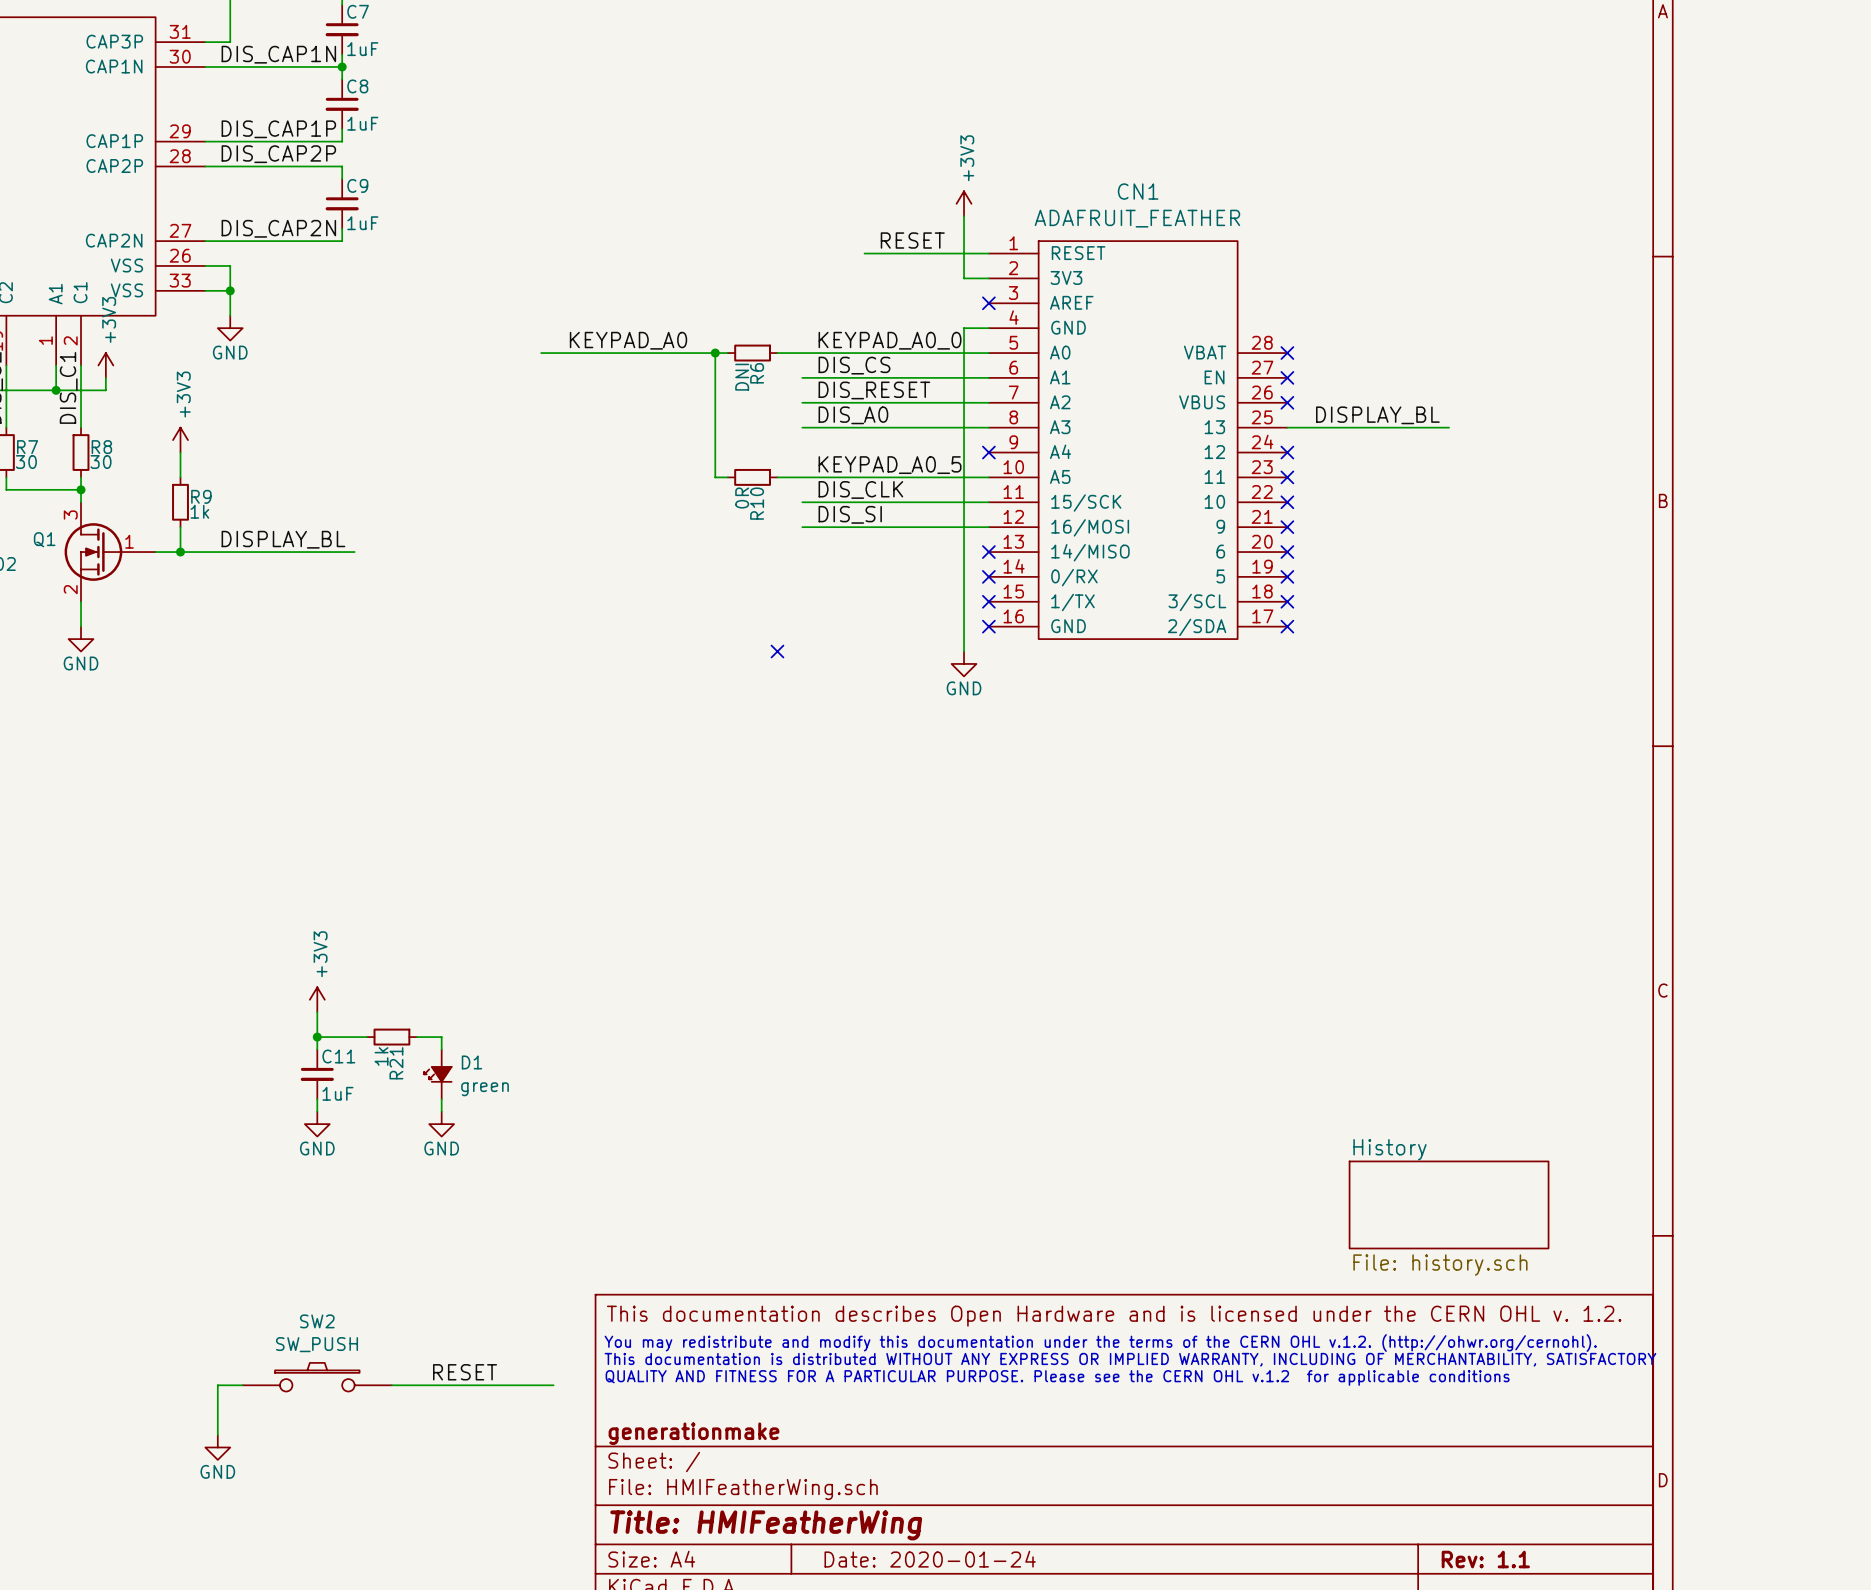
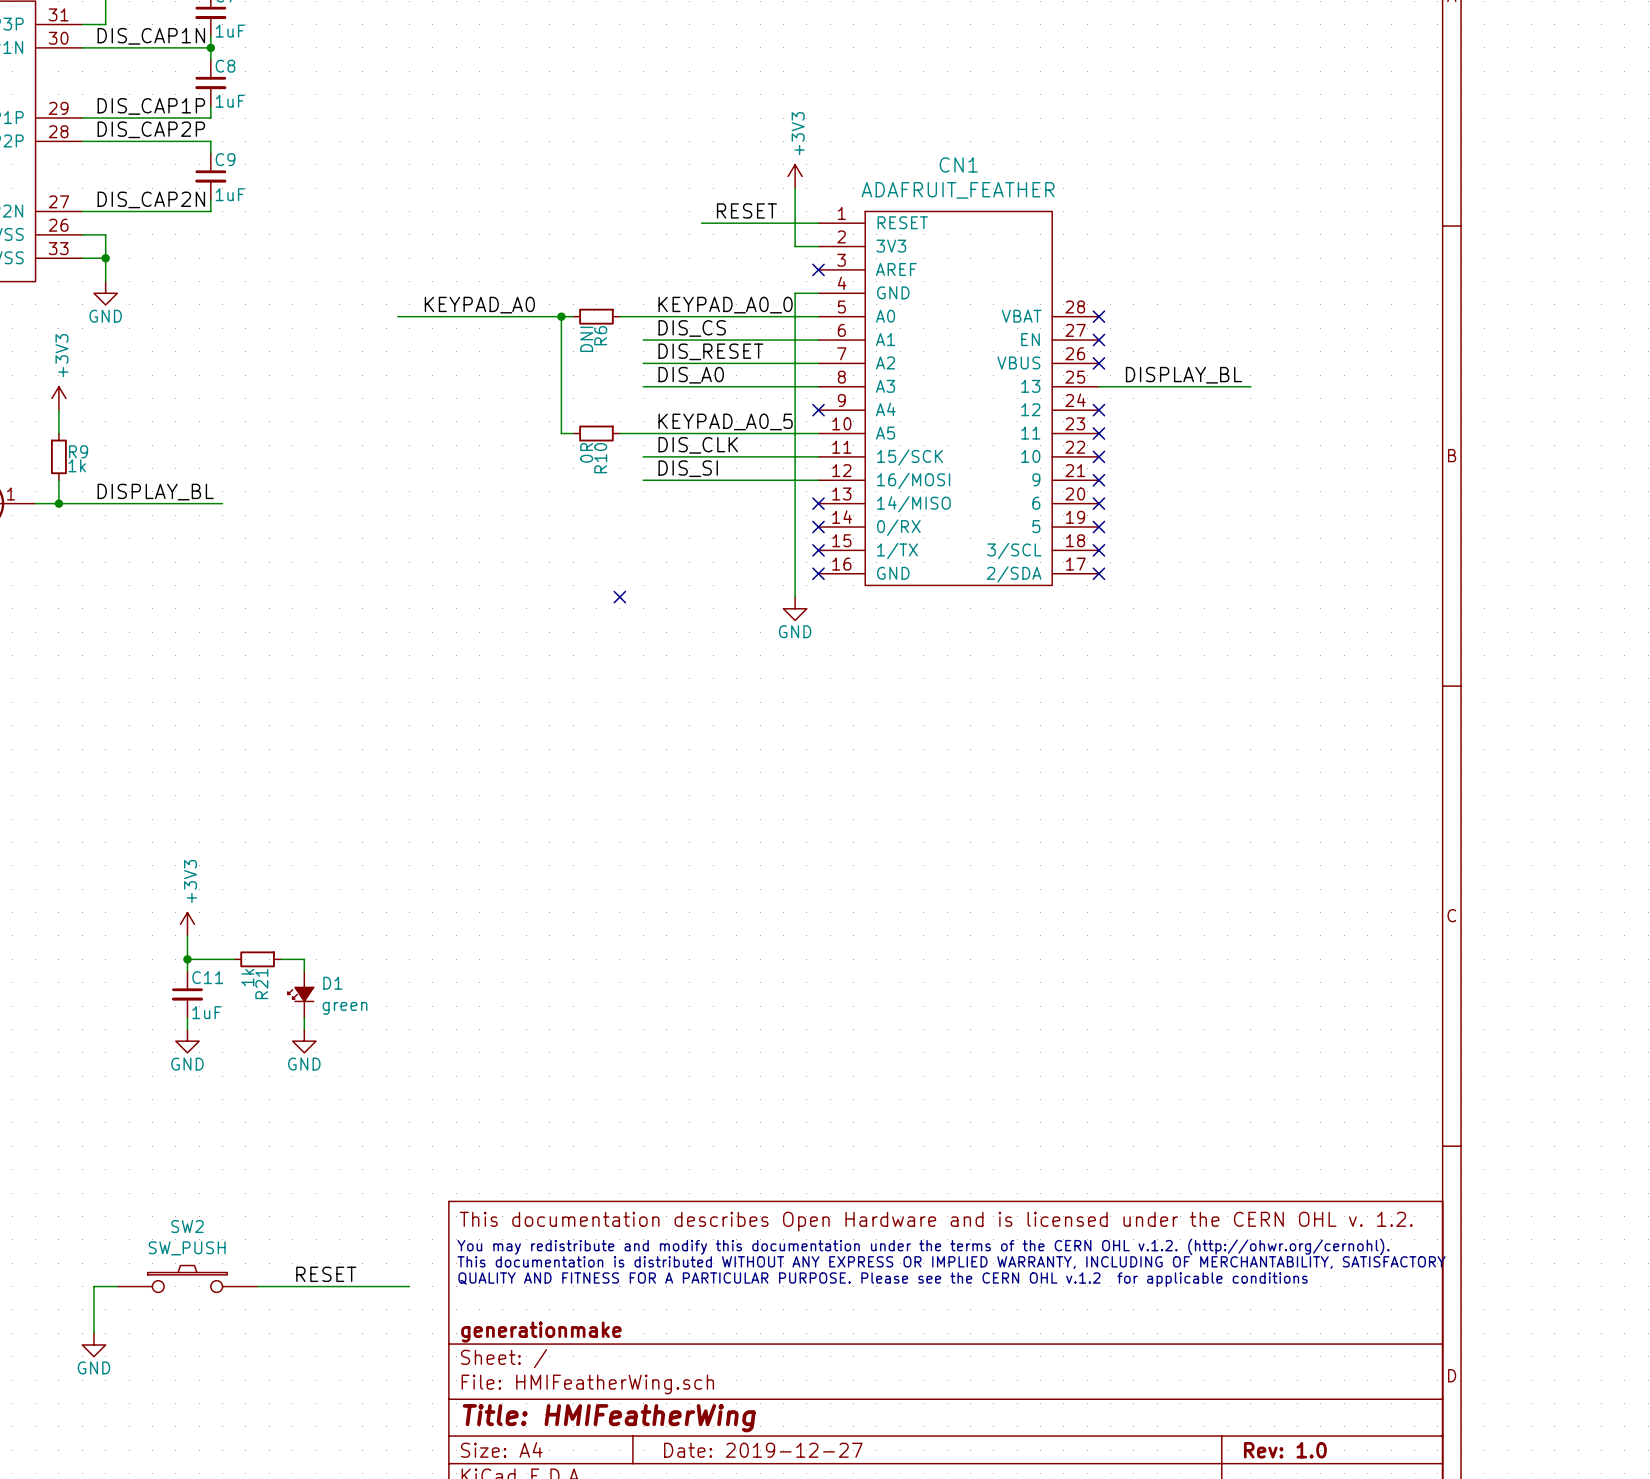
sheet History: File: history.sch (1449, 1204) -> none
title block: Date: 2020-01-24 (930, 1559) -> Date: 2019-12-27 (763, 1450)
title block: Rev: 1.1 (1485, 1559) -> Rev: 1.0 (1285, 1450)

